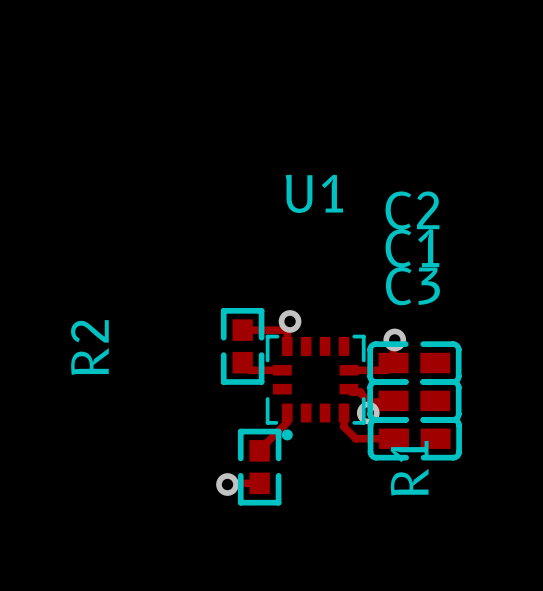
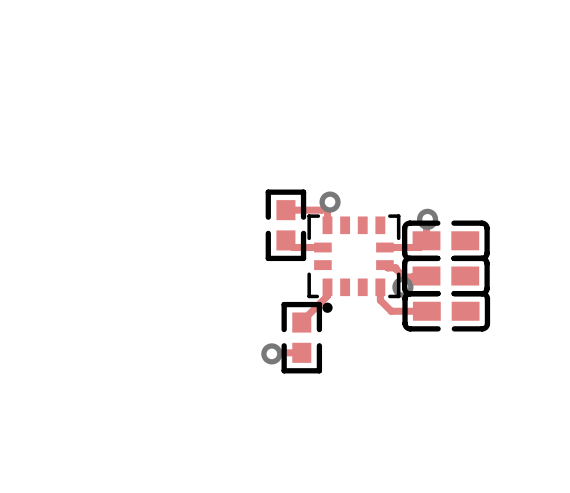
U1 name: U1 (314, 193) -> none
C2 name: C2 (412, 210) -> none
C1 name: C1 (412, 248) -> none
C3 name: C3 (412, 286) -> none
R2 name: R2 (89, 347) -> none
R1 name: R1 (409, 468) -> none

